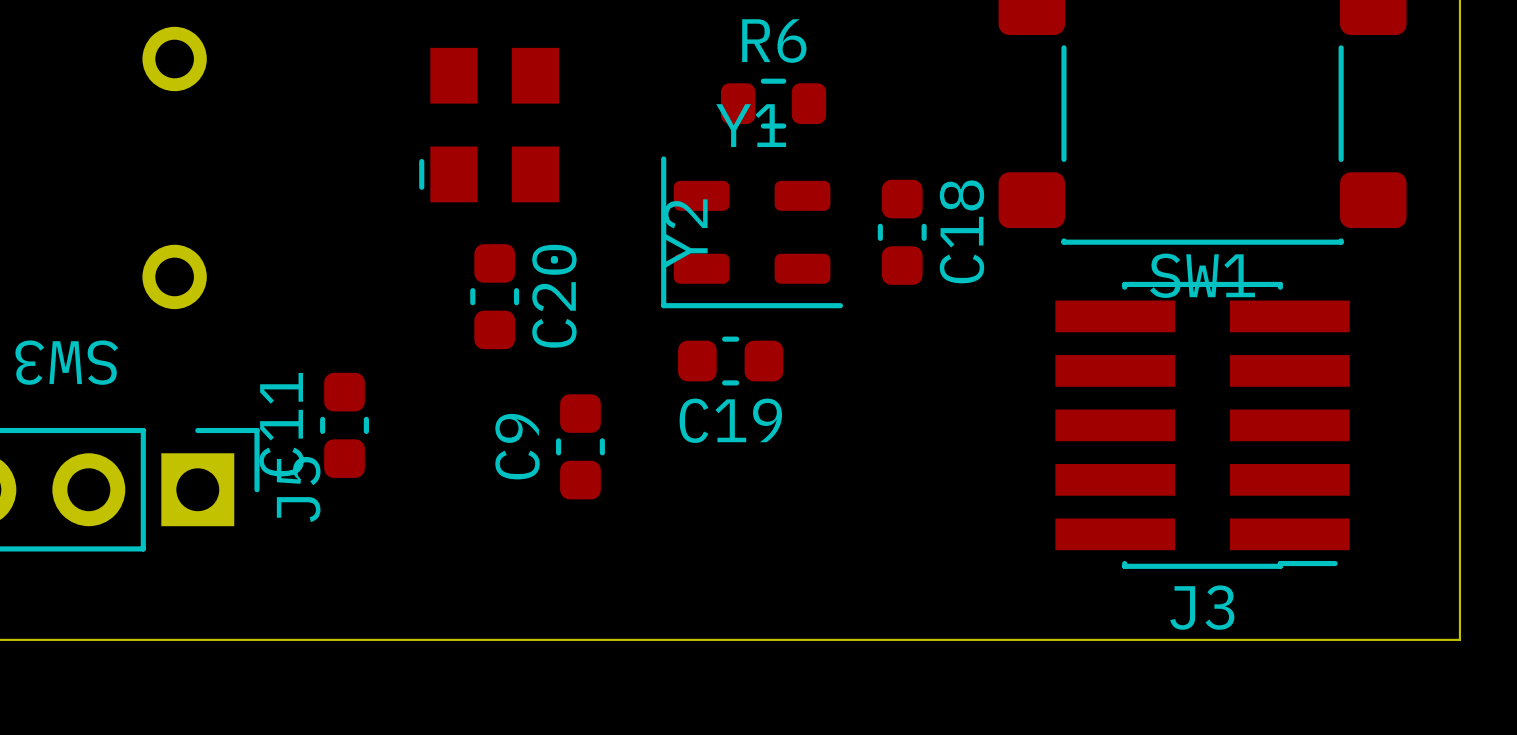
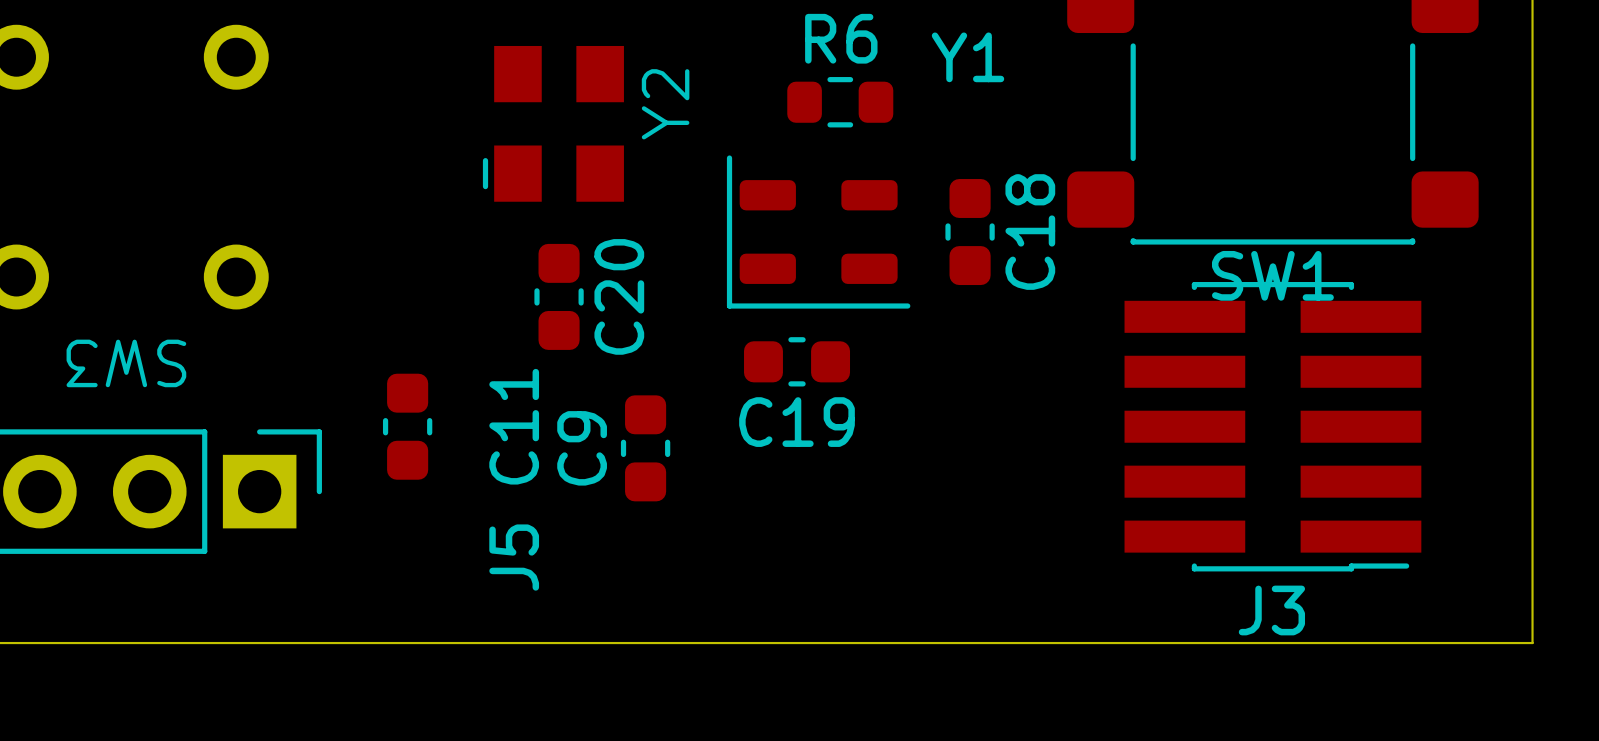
Y1 name position: Y1 (751, 125) -> Y1 (968, 57)
Y2 name position: Y2 (685, 233) -> Y2 (665, 104)
C11 name position: C11 (281, 424) -> C11 (514, 426)
J5 name position: J5 (298, 489) -> J5 (514, 557)

